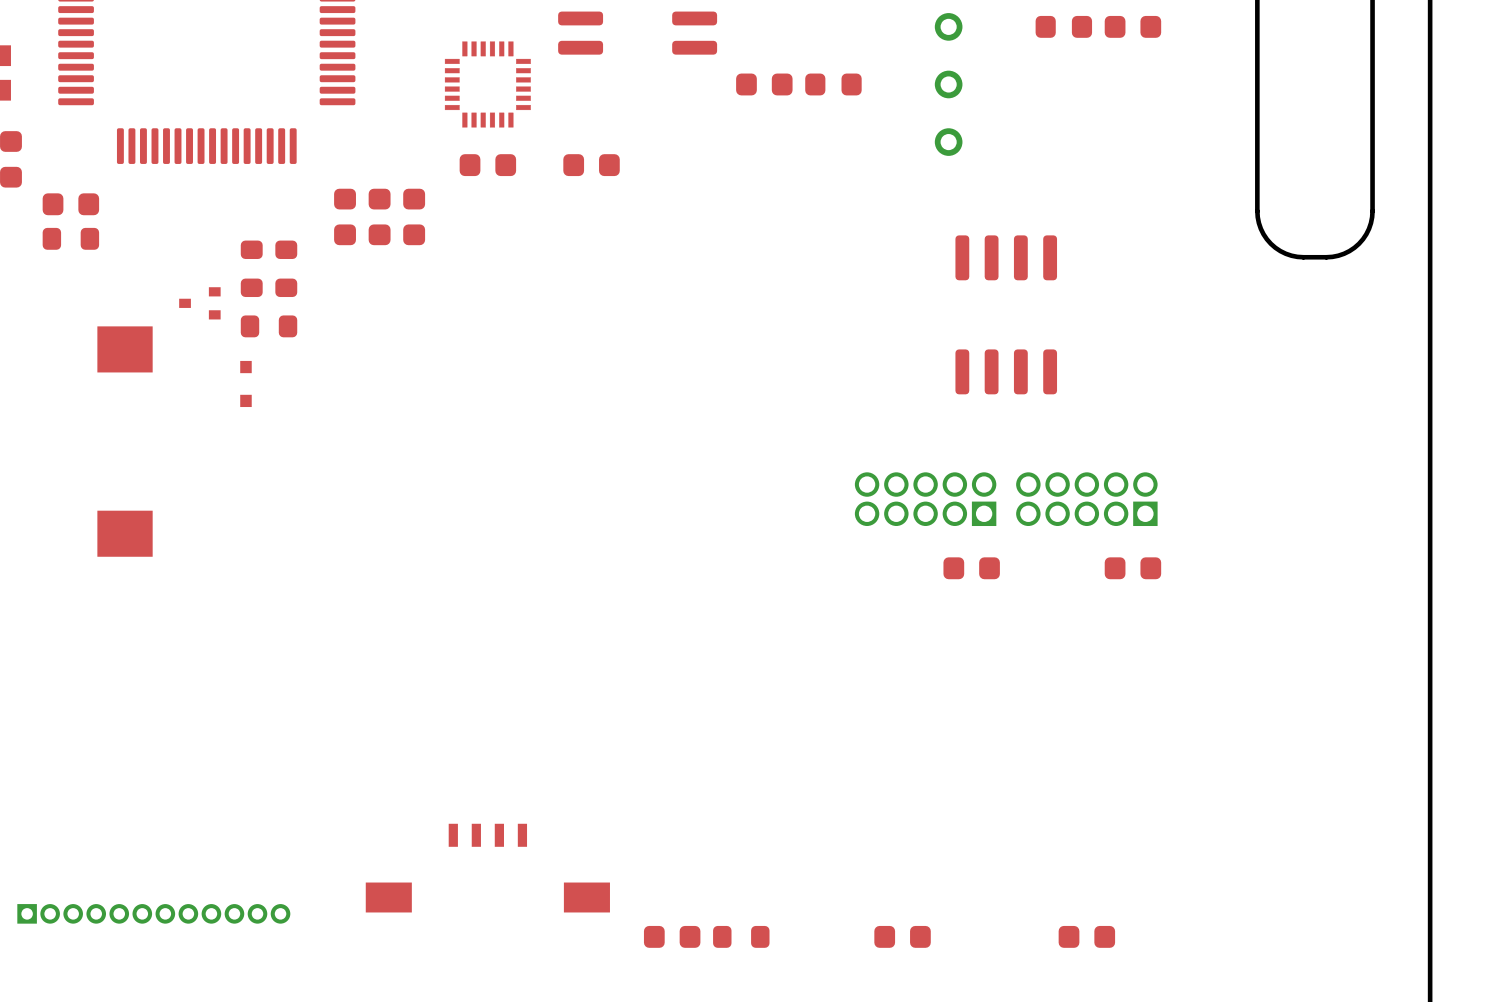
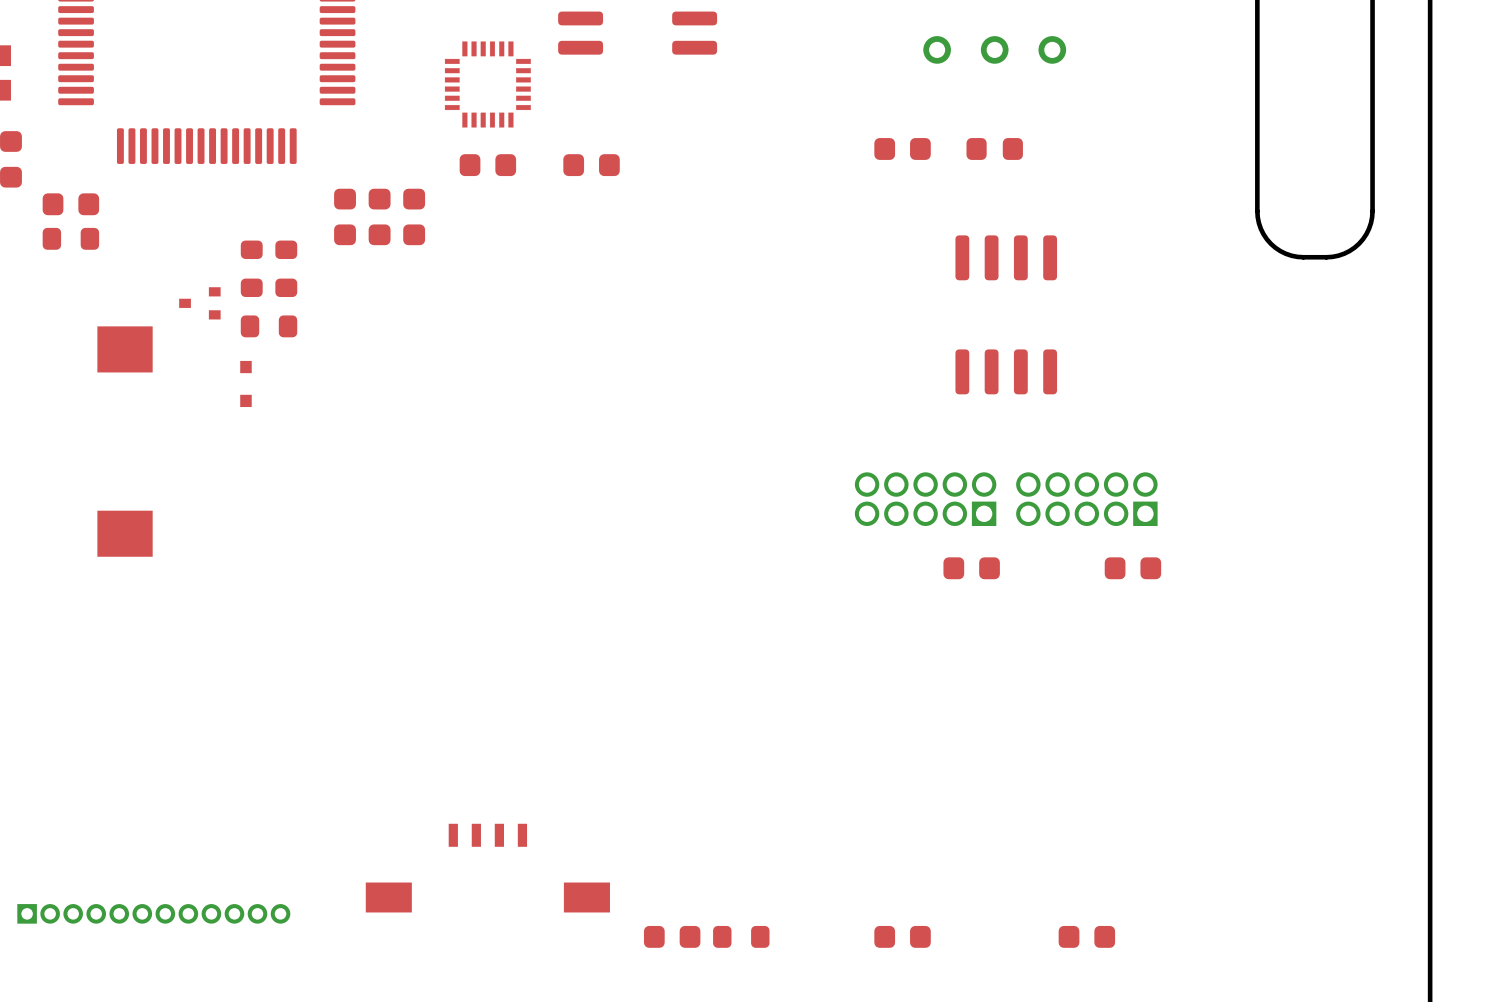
part: (1063, 26) -> none
part: (1132, 26) -> none
part: (764, 84) -> none
part: (833, 84) -> none
part rotation: 0° (948, 84) -> 90° clockwise (994, 49)
part: none -> (902, 148)
part: none -> (994, 148)

